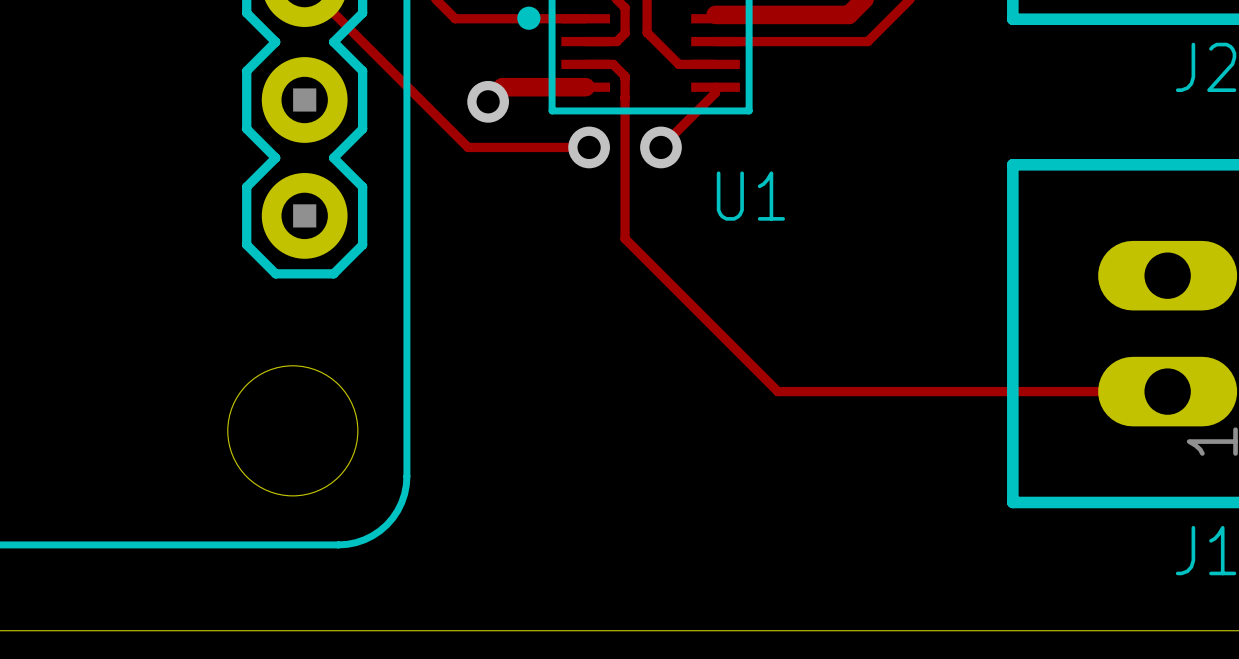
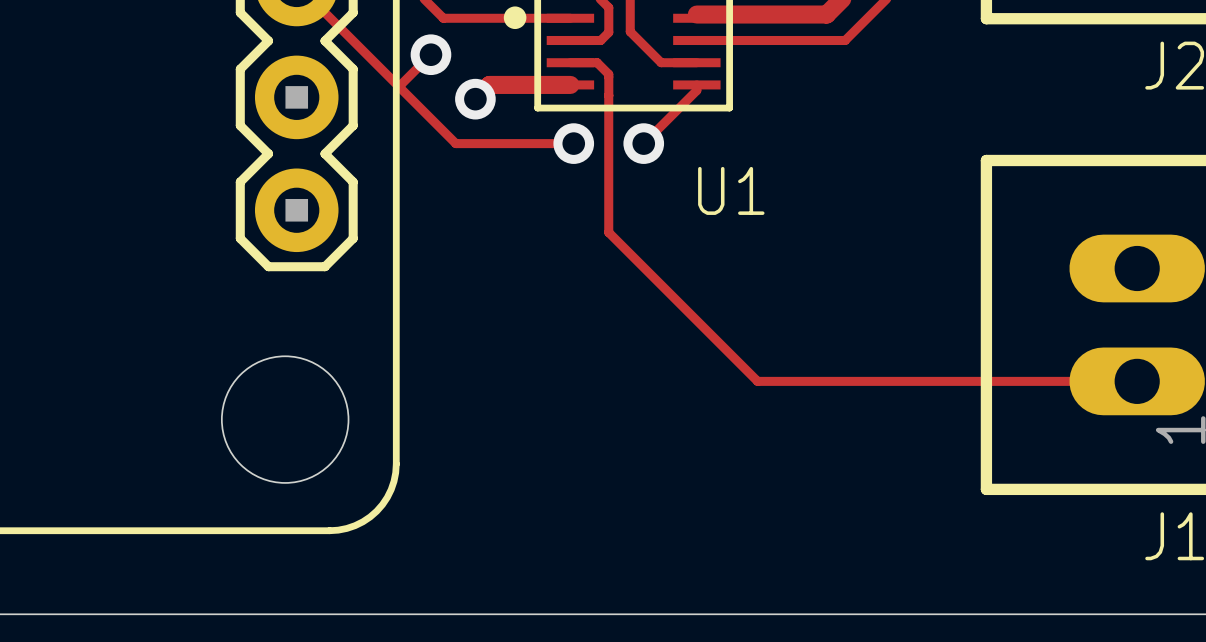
track: none -> (430, 54) (398, 86)
via: none -> (430, 54)

